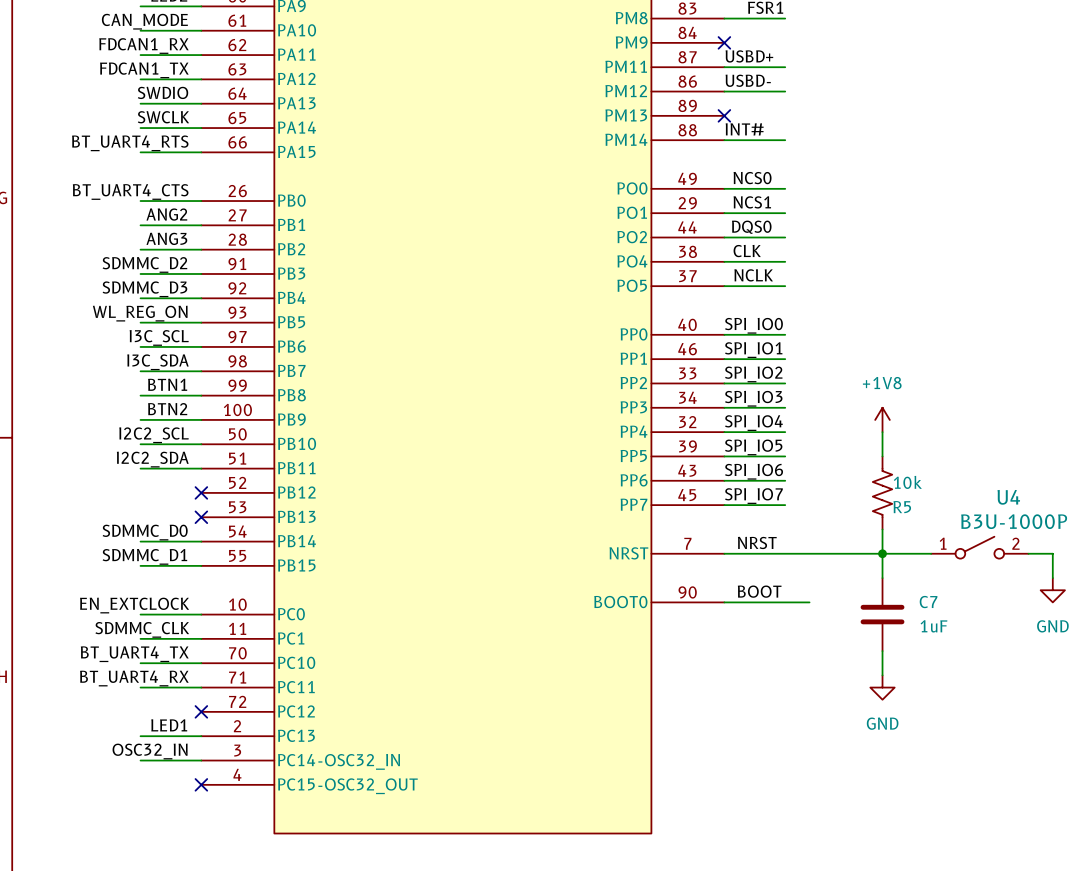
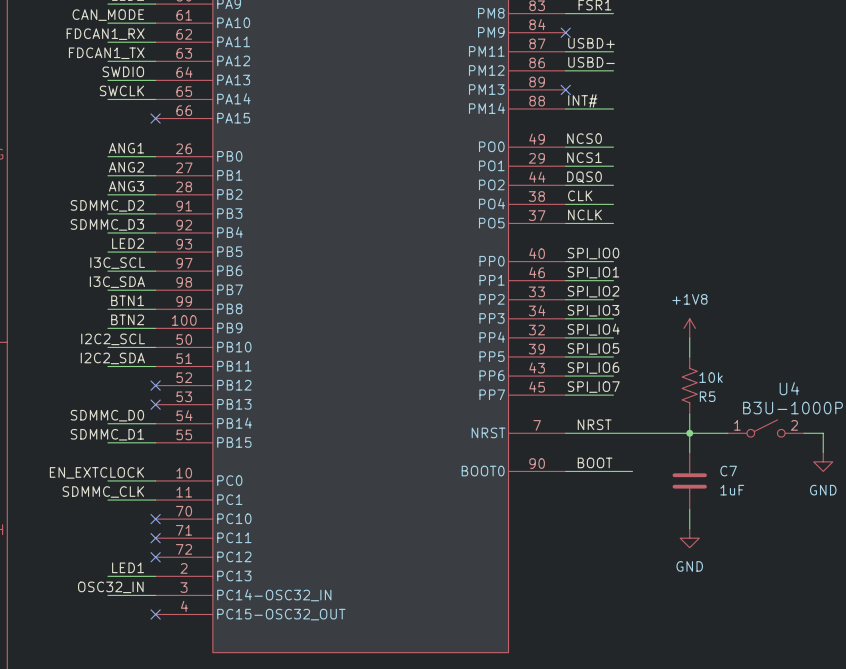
label: BT_UART4_RTS (130, 143) -> none
wire: (140, 152) (201, 152) -> none
no-connect mark: none -> (155, 118)
label: BT_UART4_CTS (130, 191) -> ANG1 (126, 148)
label: WL_REG_ON (140, 313) -> LED2 (128, 243)
label: BT_UART4_TX (134, 654) -> none
wire: (140, 663) (201, 663) -> none
no-connect mark: none -> (155, 519)
label: BT_UART4_RX (134, 678) -> none
wire: (140, 687) (201, 687) -> none
no-connect mark: none -> (155, 538)

